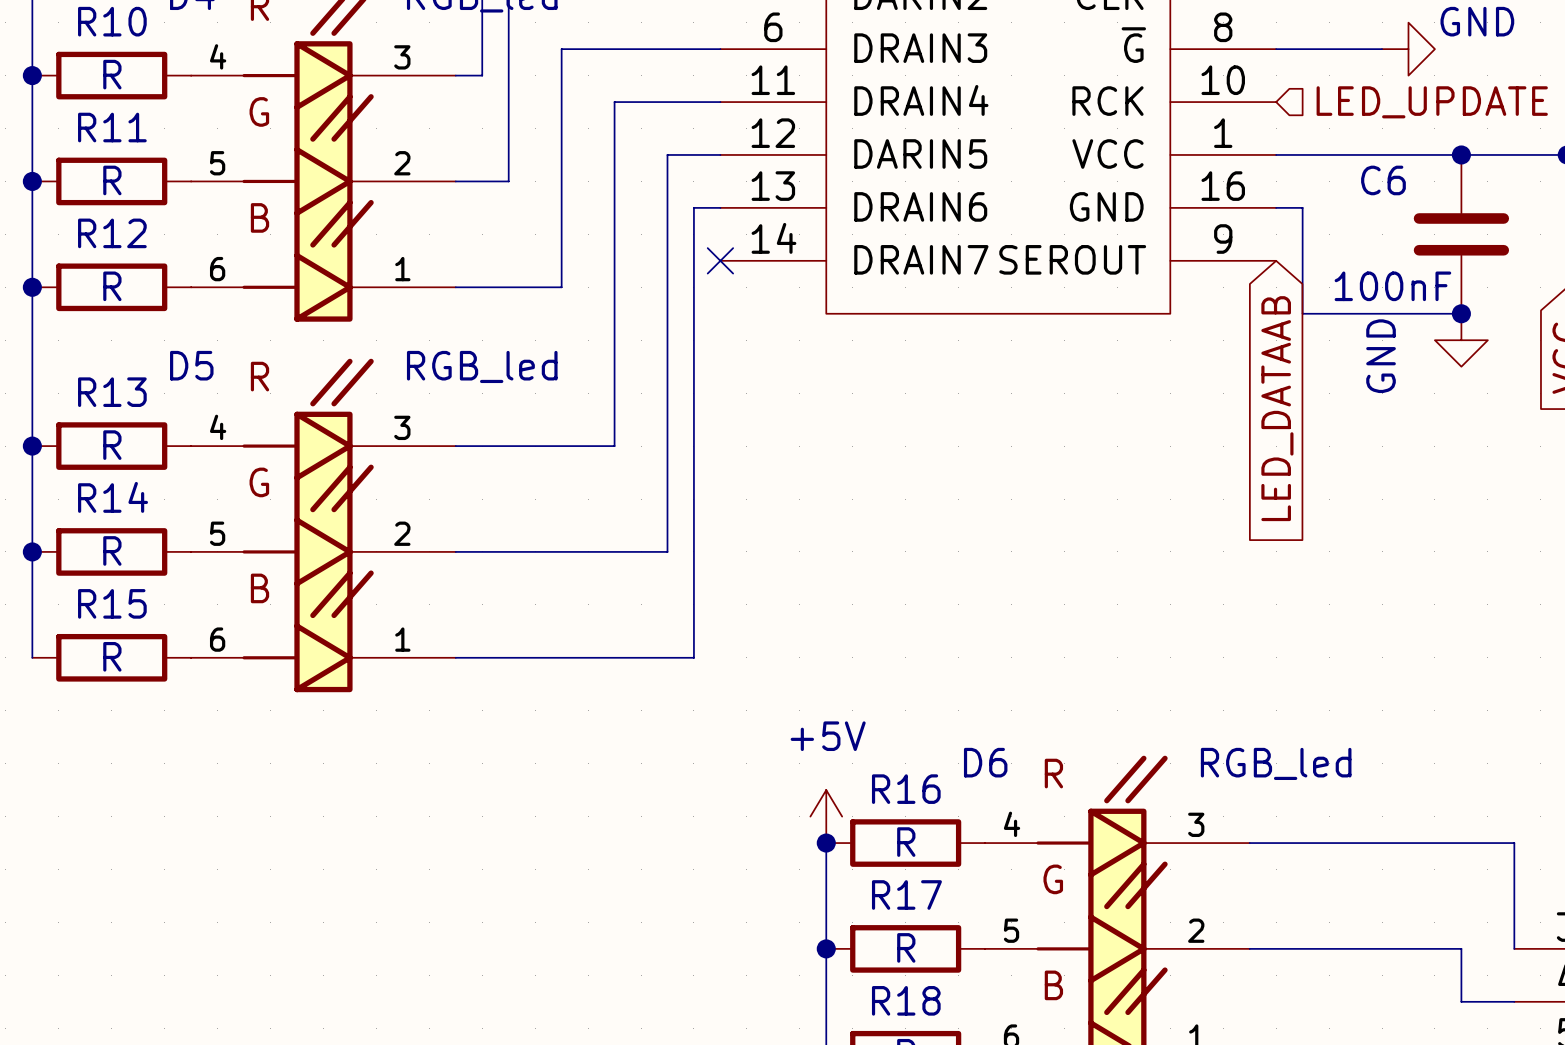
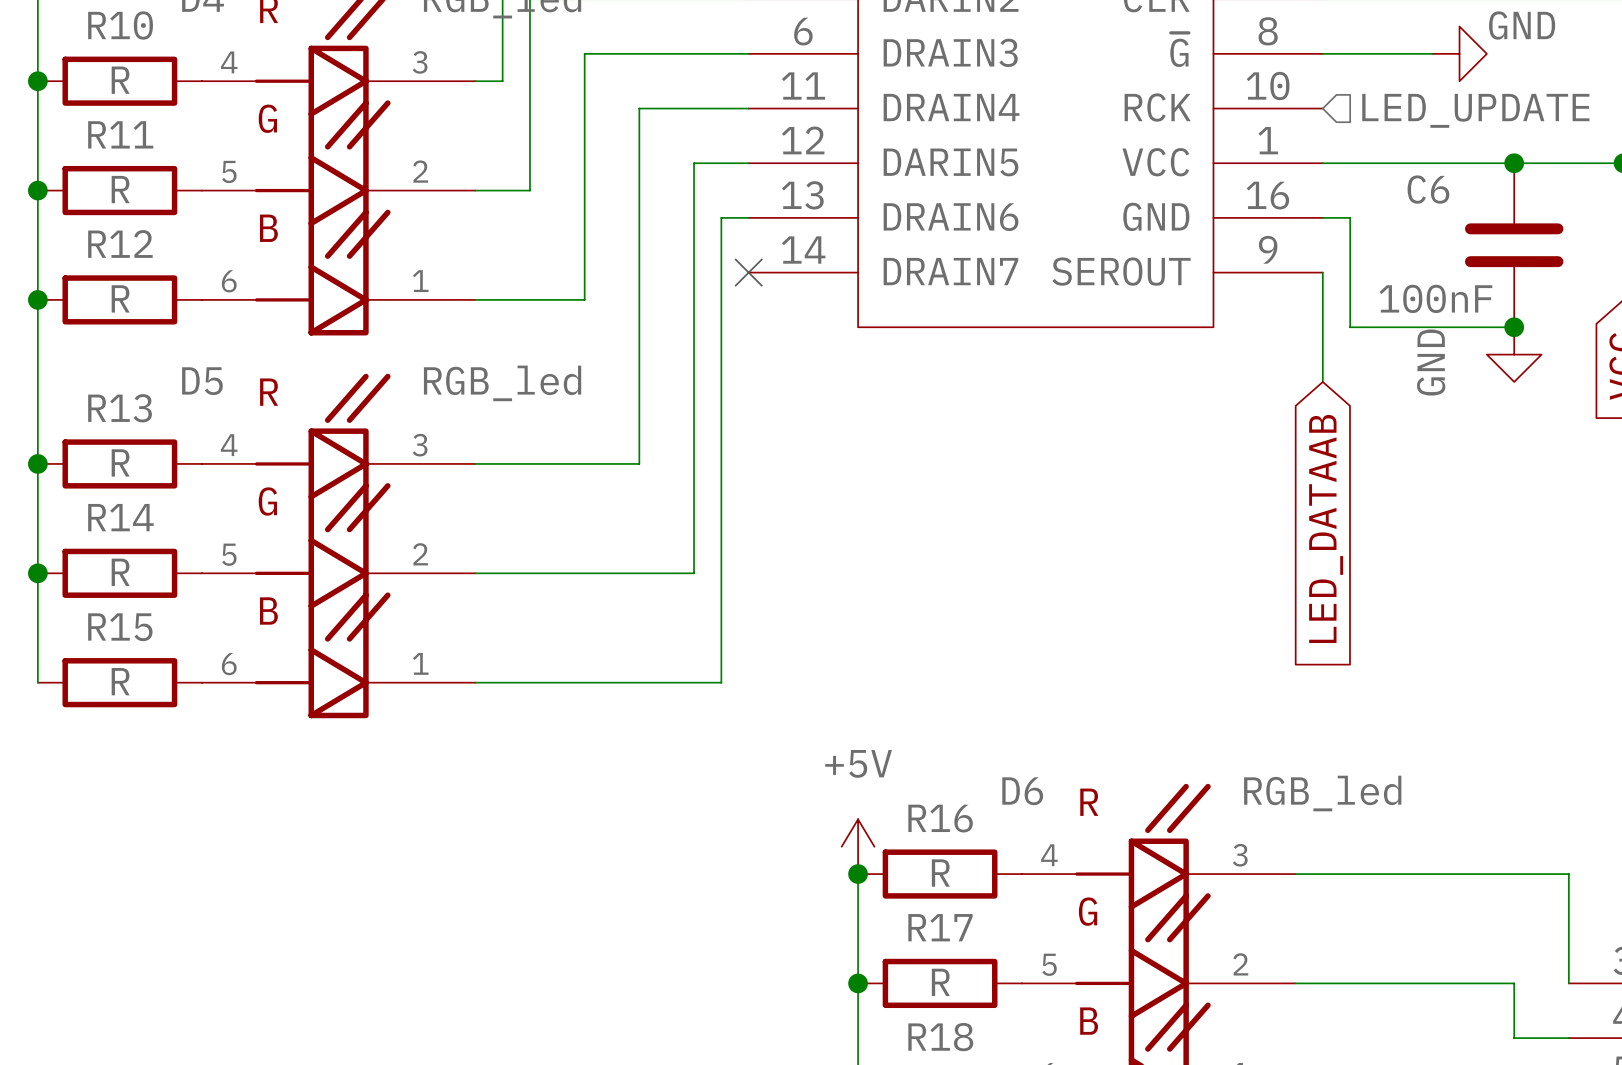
wire: none -> (1322, 272) (1322, 381)
global label position: LED_DATAAB (1277, 408) -> LED_DATAAB (1326, 528)

